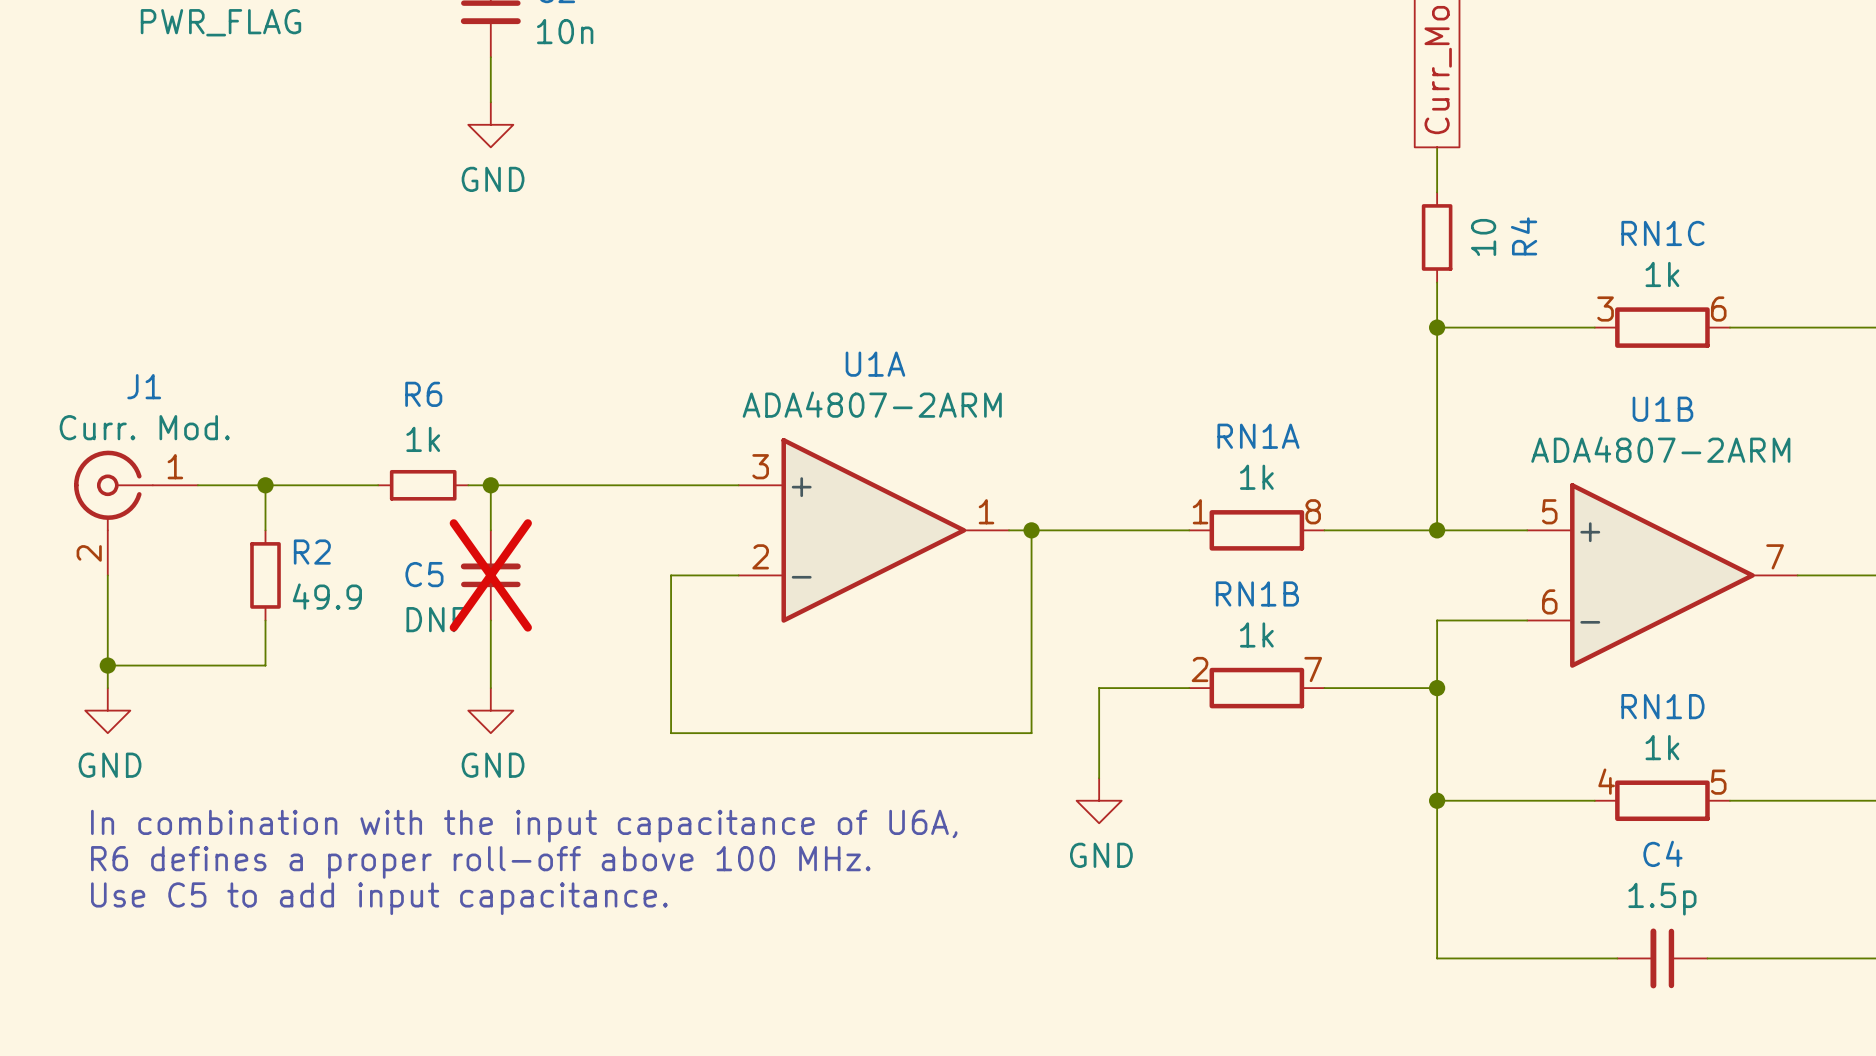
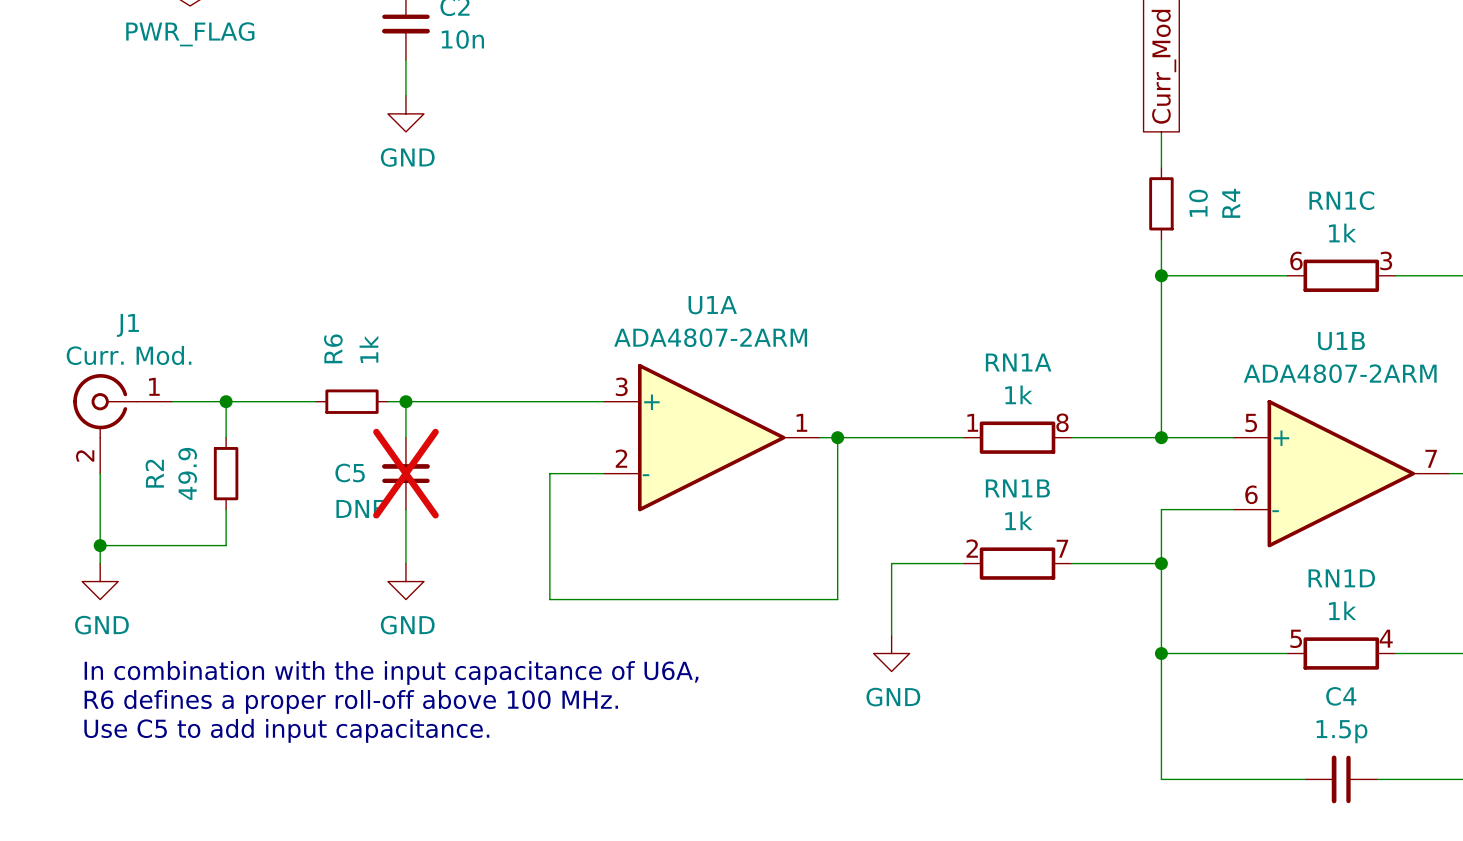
RN1C rotation: 0° (1662, 327) -> 180° (1341, 275)
R6 name rotation: 0° (423, 394) -> 90° counterclockwise (333, 348)
R6 value rotation: 0° (423, 439) -> 90° counterclockwise (368, 349)
R2 name rotation: 0° (312, 552) -> 90° counterclockwise (154, 473)
R2 name position: R2 (312, 552) -> R2 (154, 473)
R2 value rotation: 0° (327, 596) -> 90° counterclockwise (187, 473)
R2 value position: 49.9 (327, 596) -> 49.9 (187, 473)
RN1D rotation: 0° (1662, 800) -> 180° (1341, 653)

